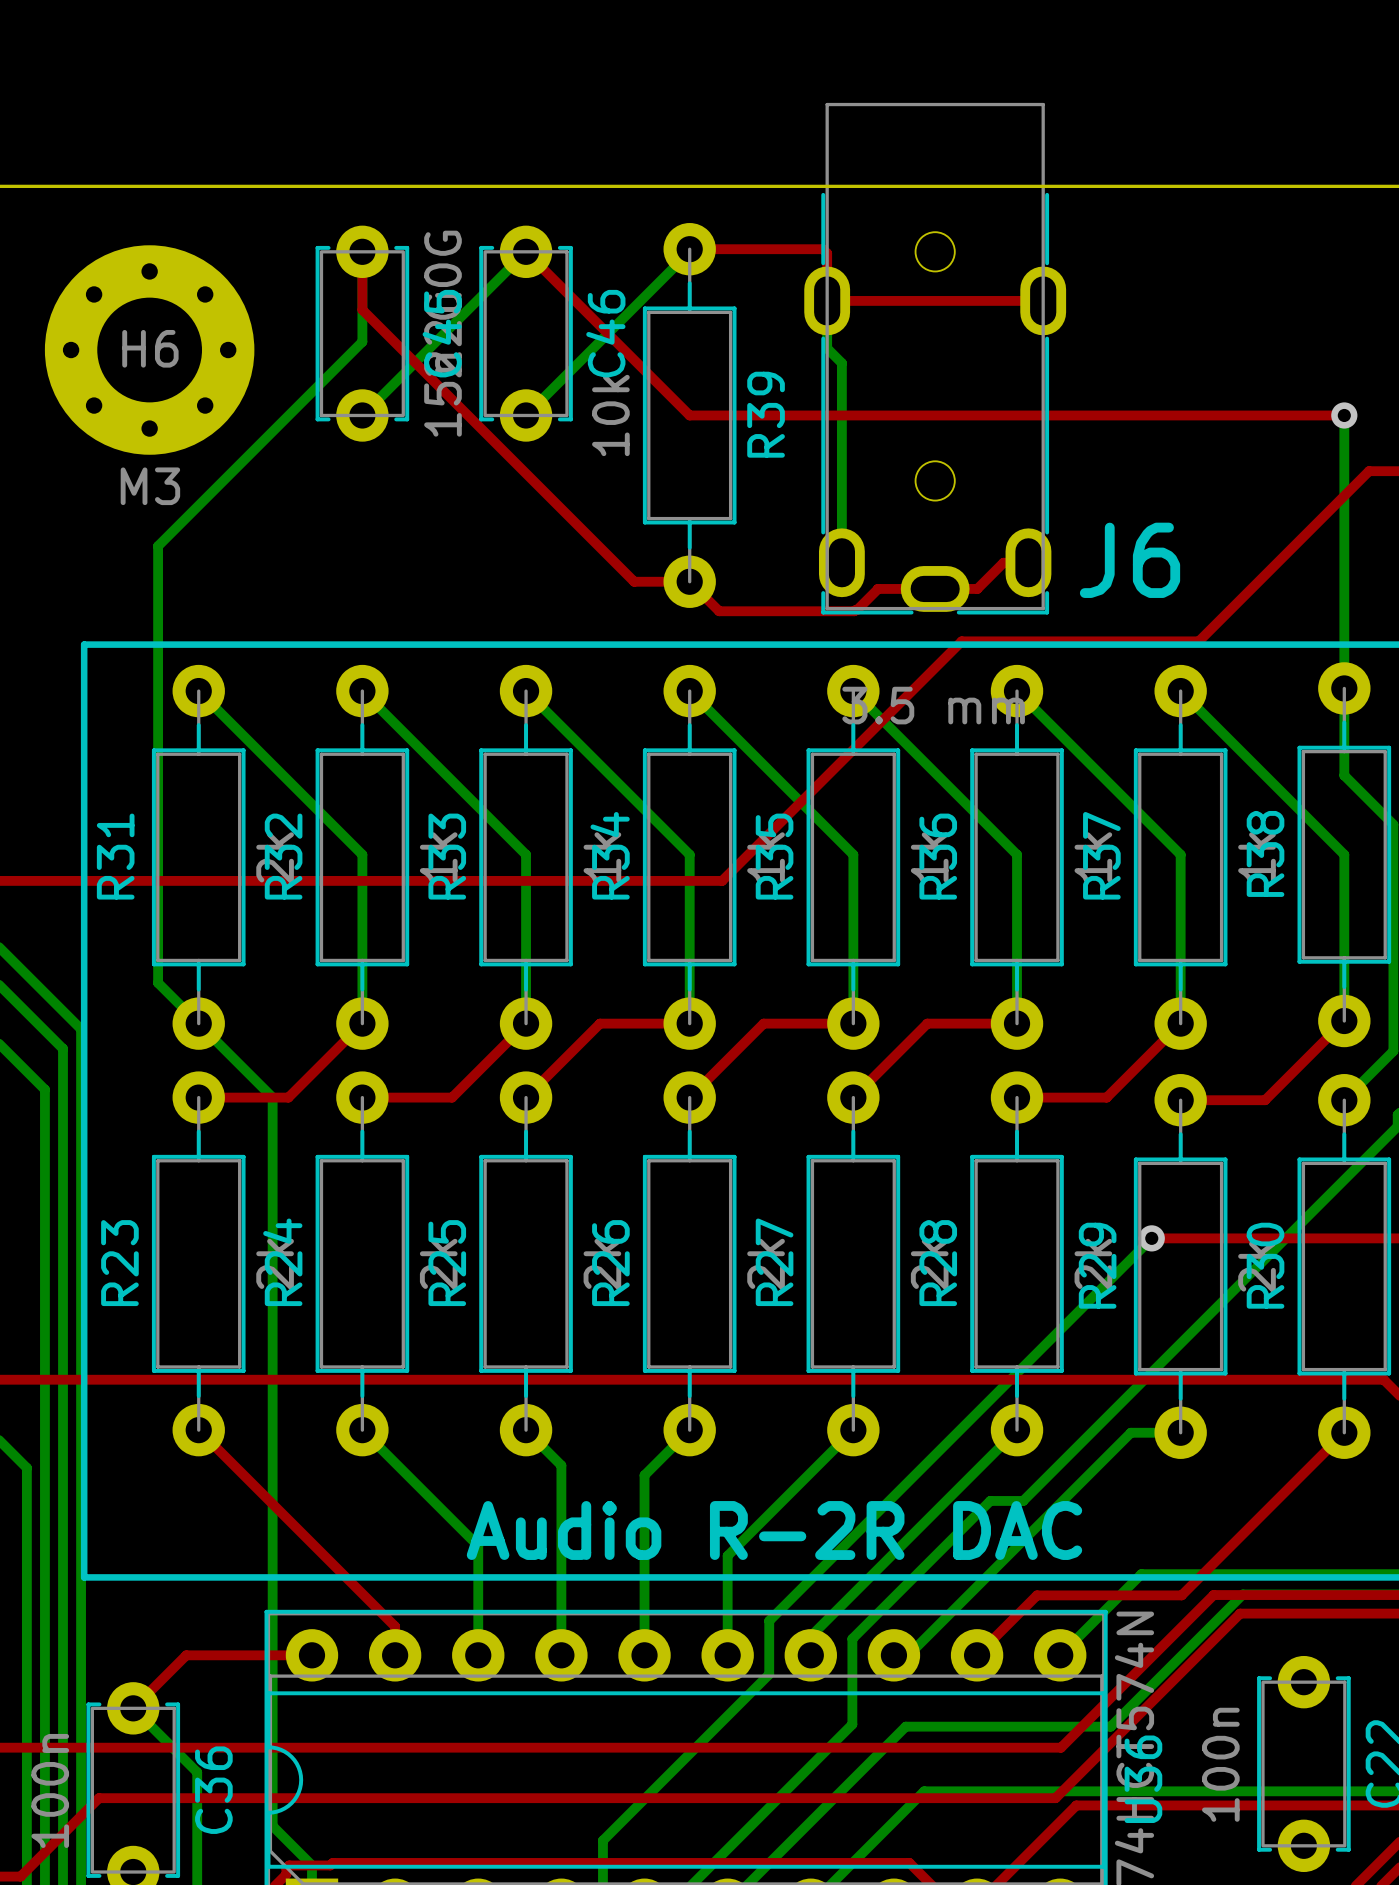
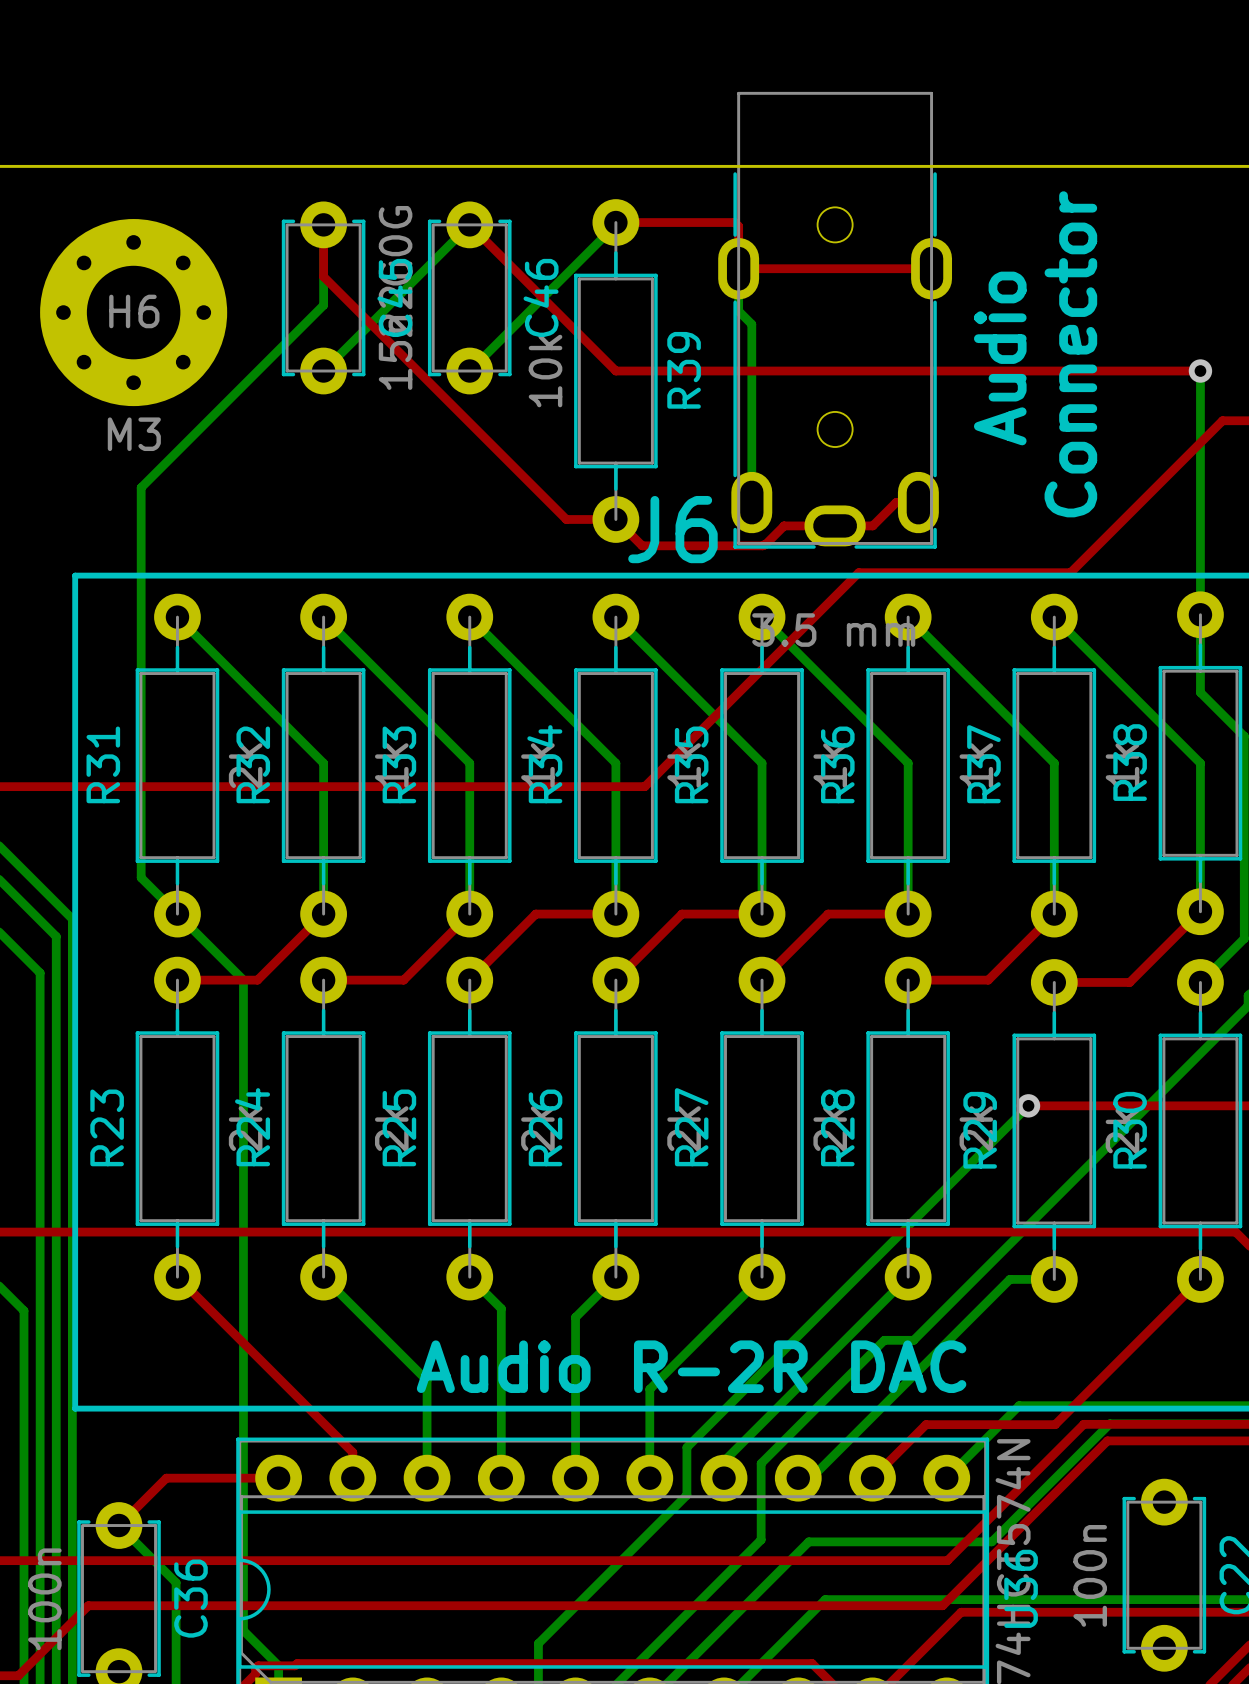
text: none -> Connector (1070, 354)
text: none -> Audio (1000, 358)
J6 name position: J6 (1130, 560) -> J6 (672, 529)

